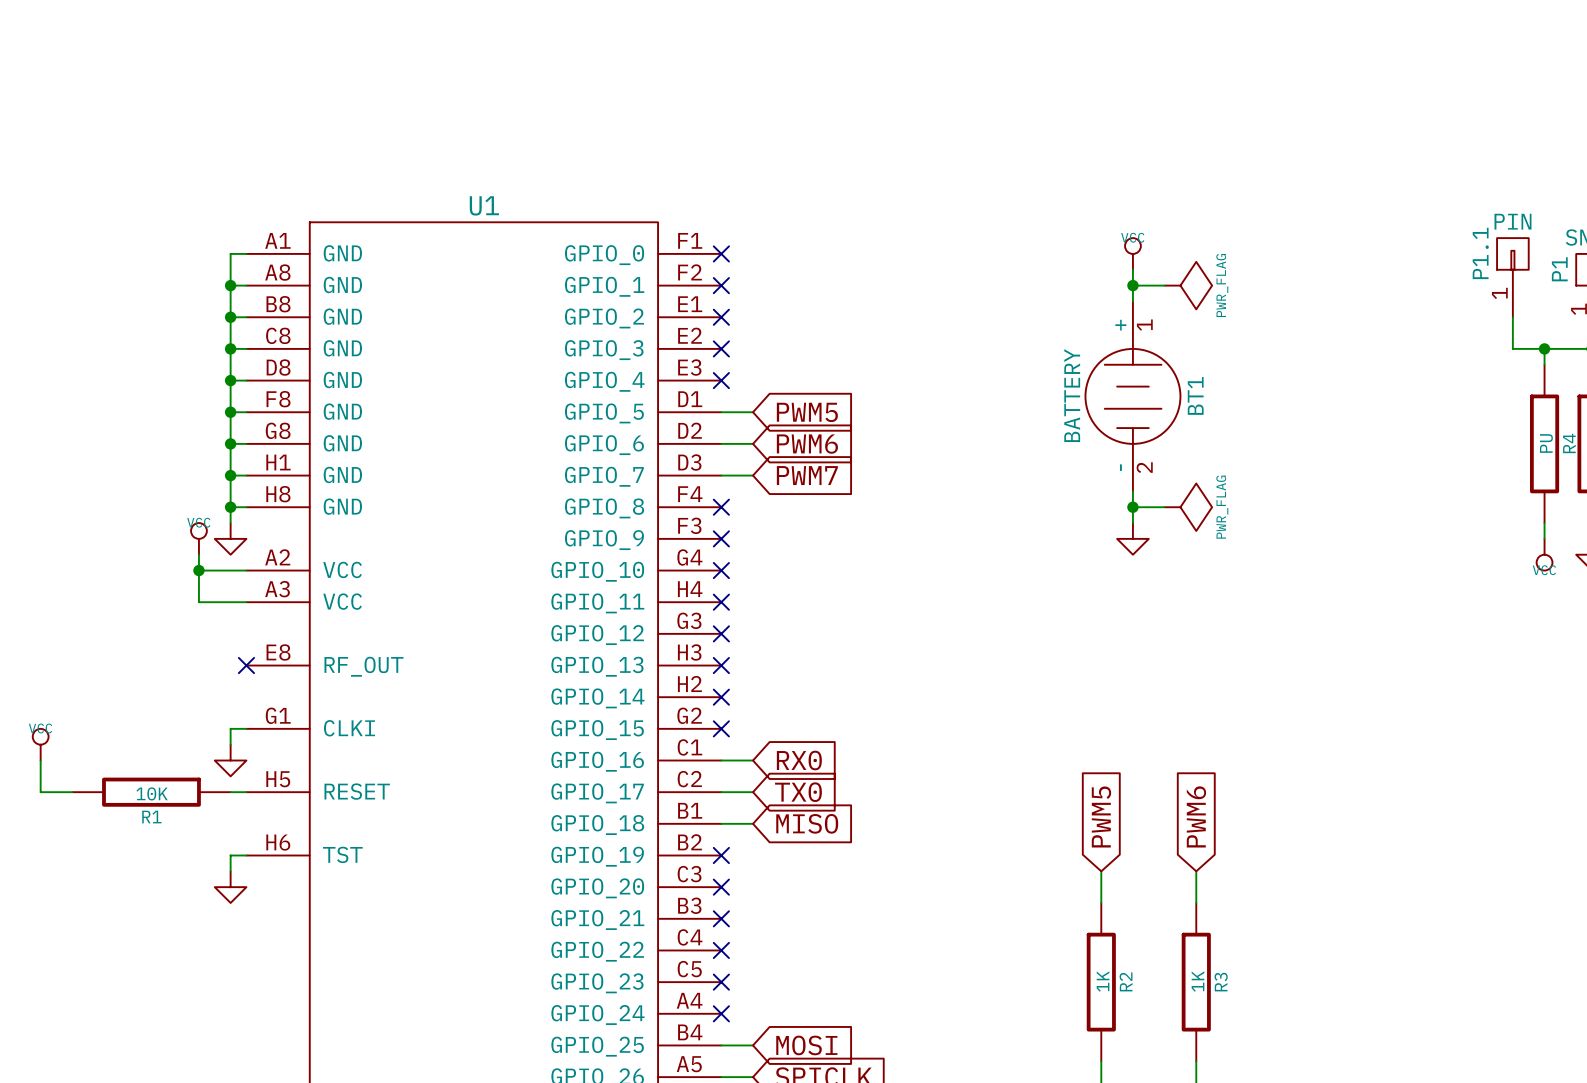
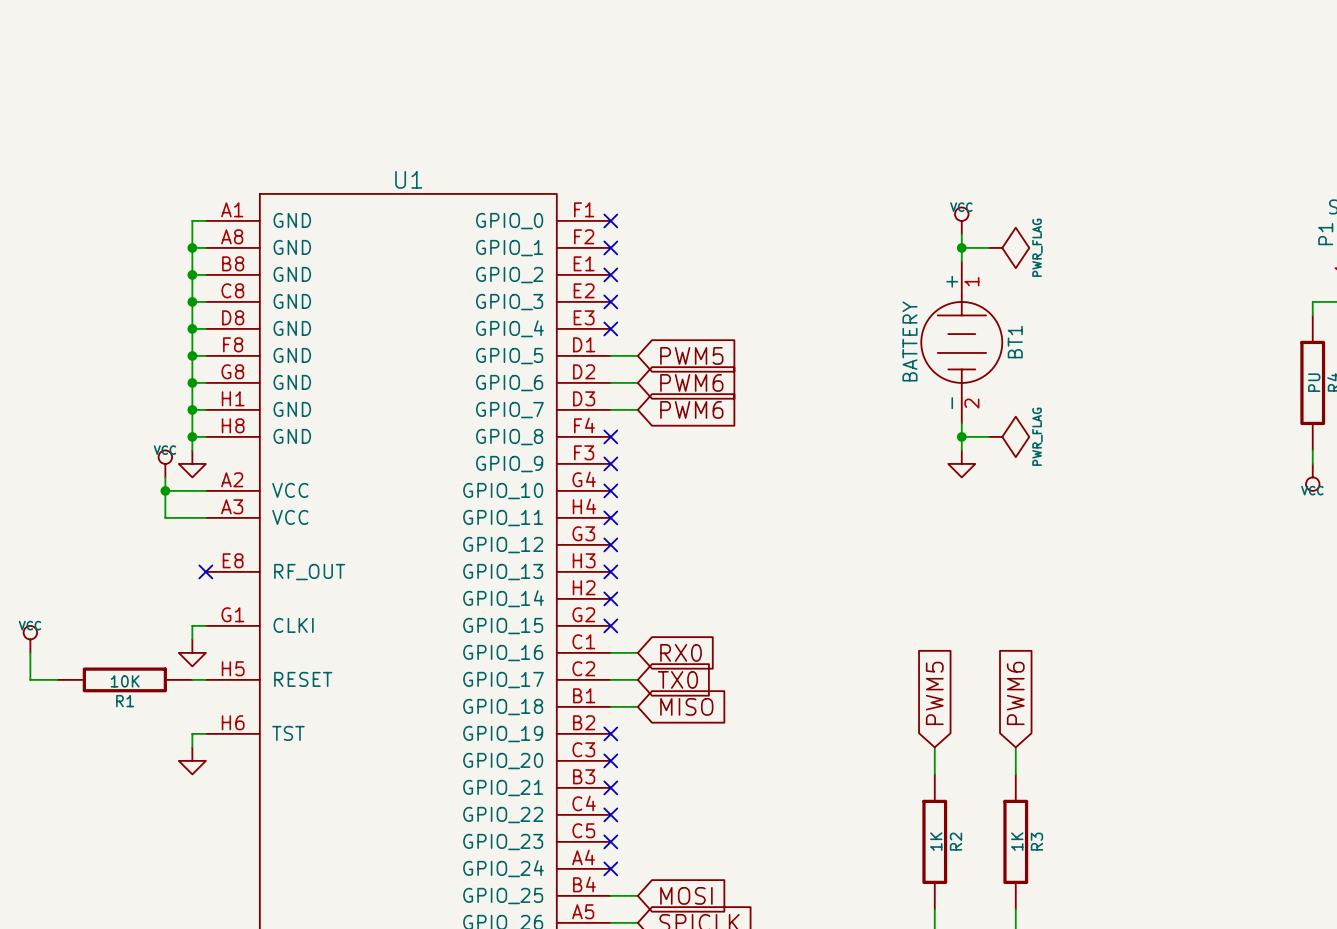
P1.1: PIN (1512, 277) -> none
wire: (1512, 317) (1512, 348) (1544, 348) -> none
junction: (1544, 348) -> none
global label: PWM7 (807, 475) -> PWM6 (691, 409)

